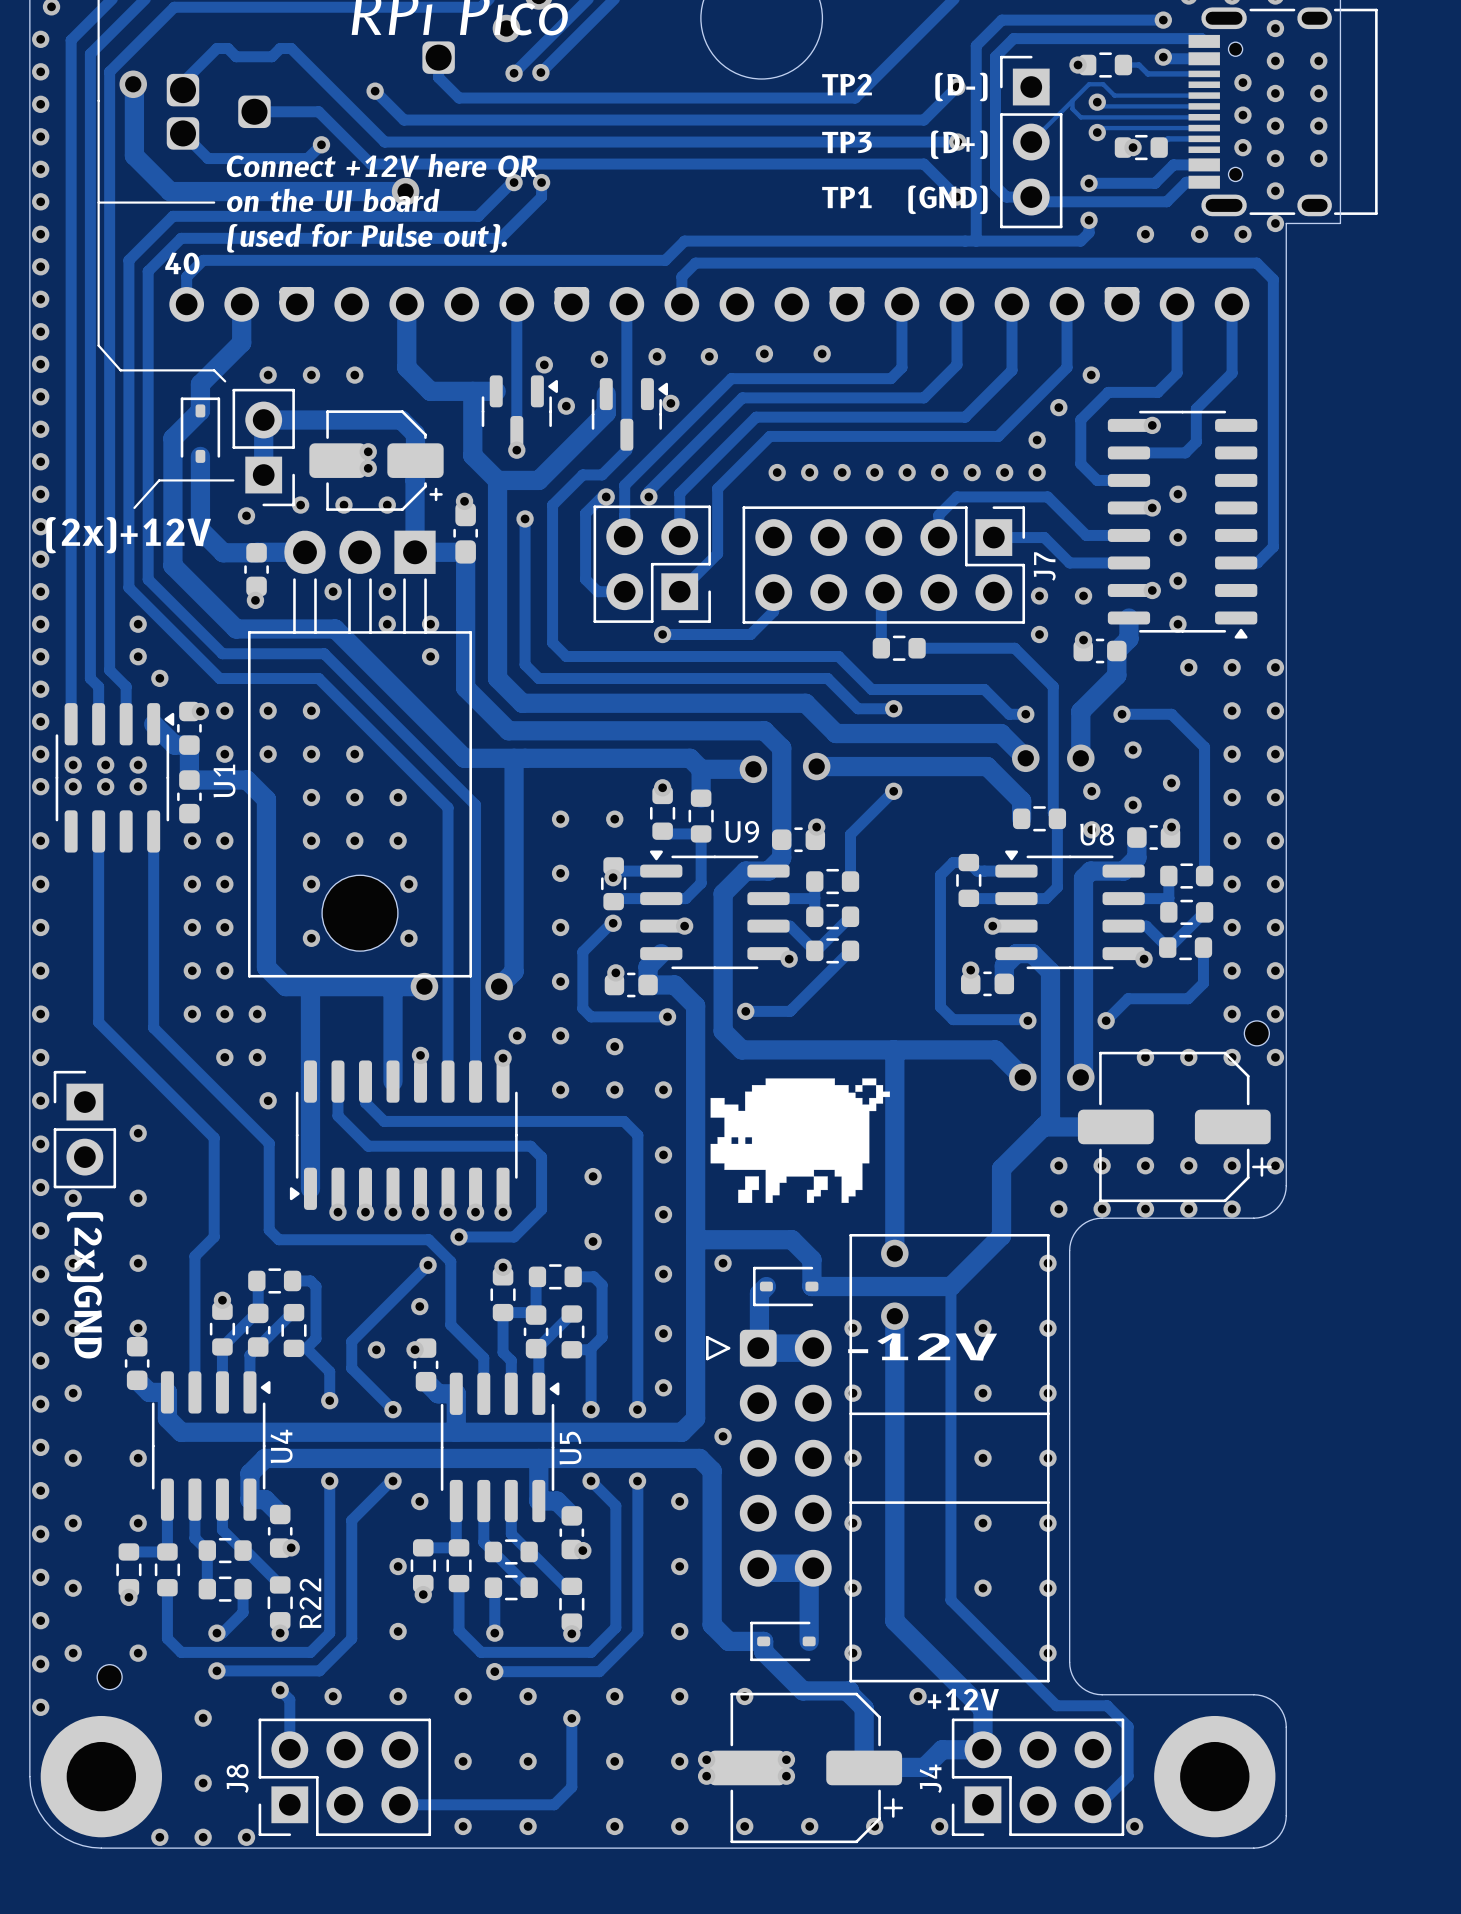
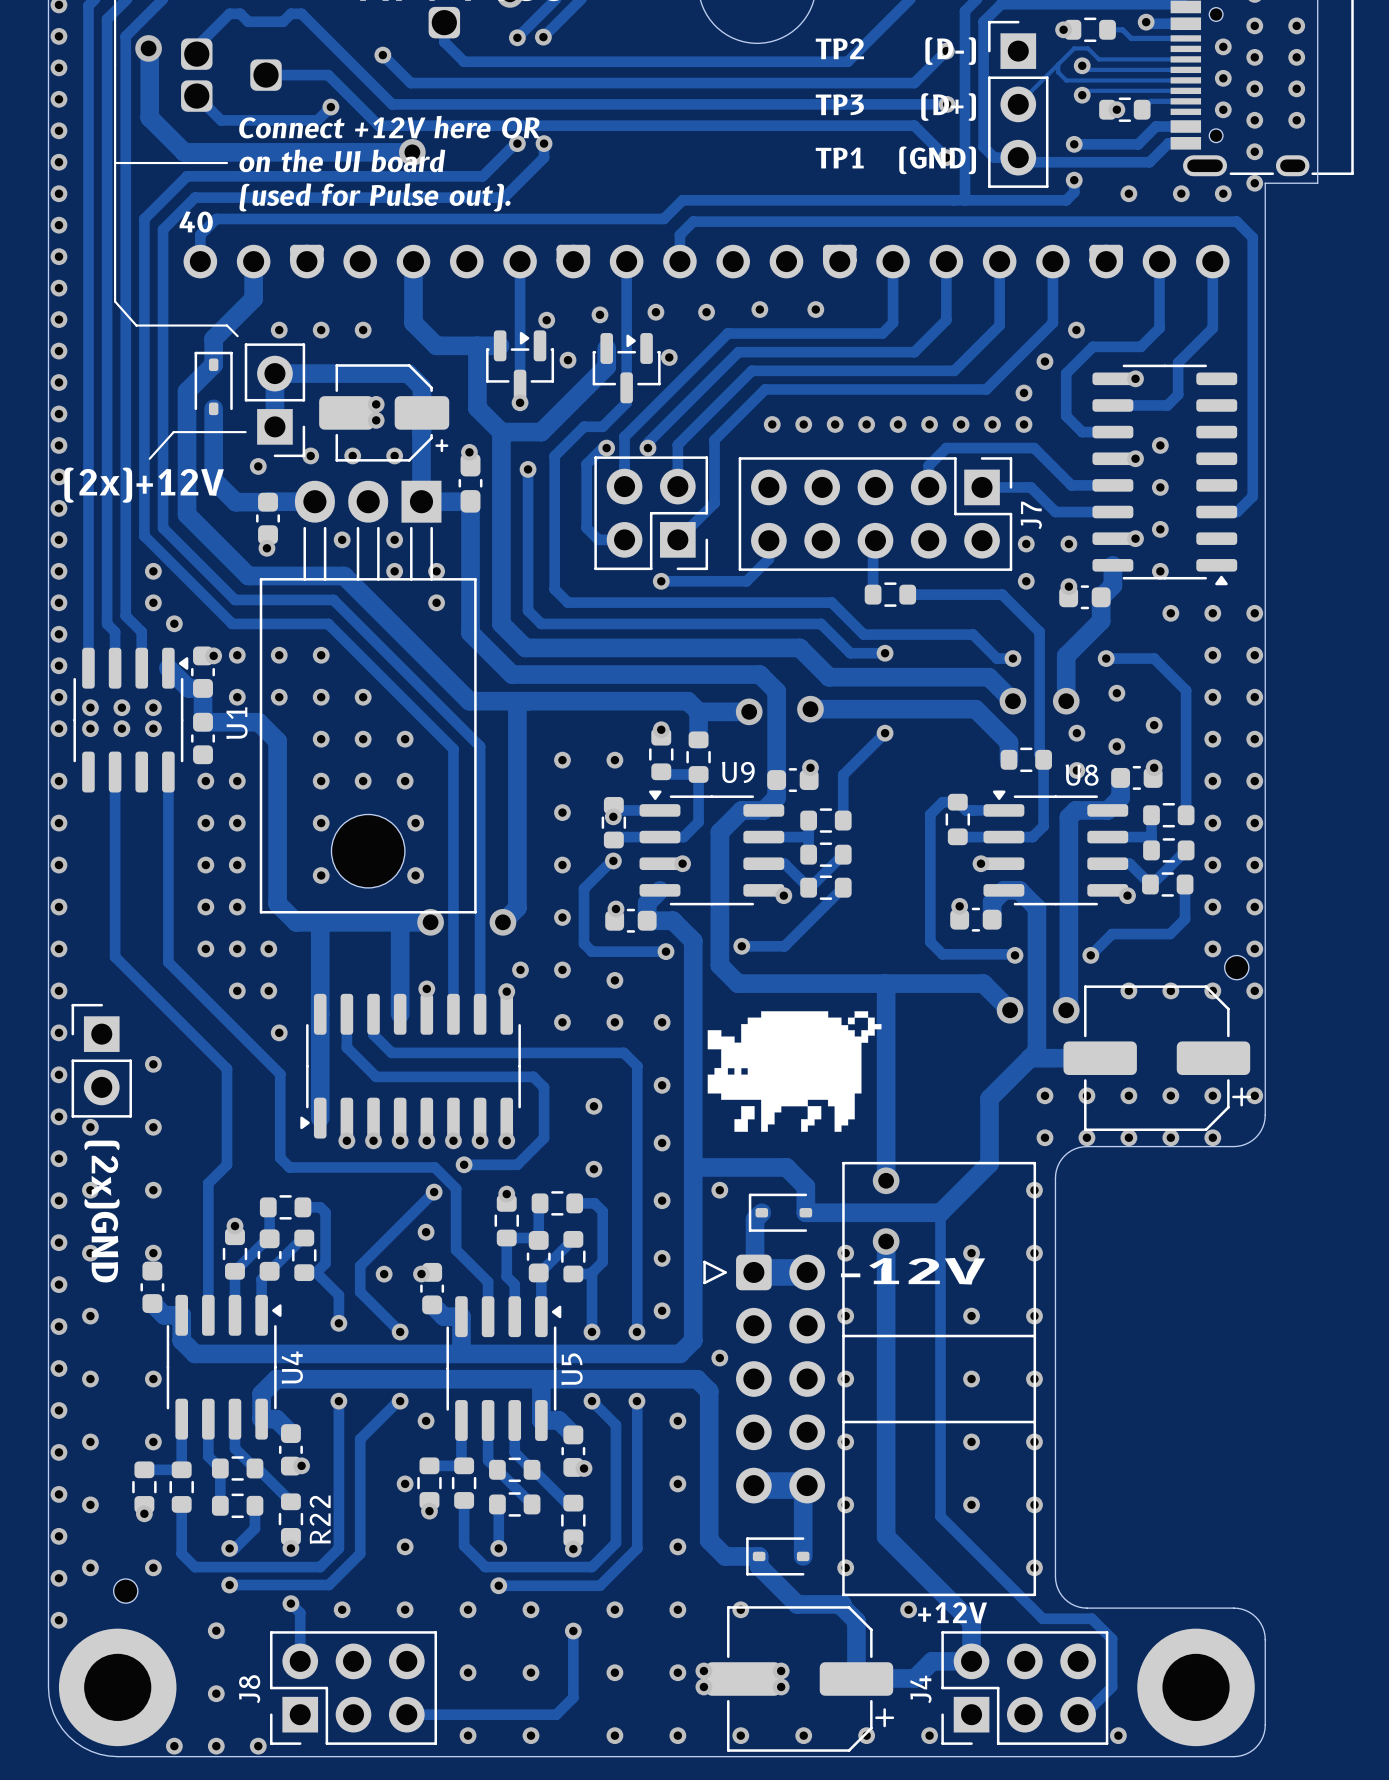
part footprint: [481, 375, 558, 448] -> [486, 330, 555, 401]
part footprint: [591, 378, 669, 451] -> [592, 333, 661, 404]

